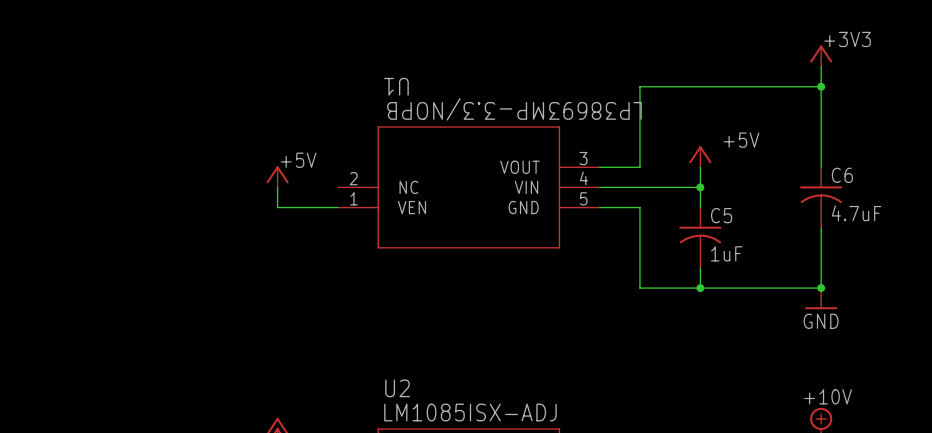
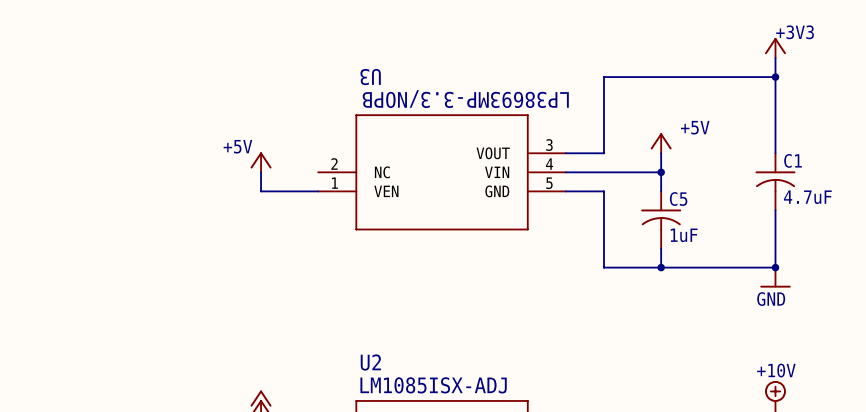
U1 name: U1 (396, 86) -> U3 (370, 77)
power symbol text position: +5V (298, 160) -> +5V (237, 146)
C6 name: C6 (842, 175) -> C1 (793, 160)

